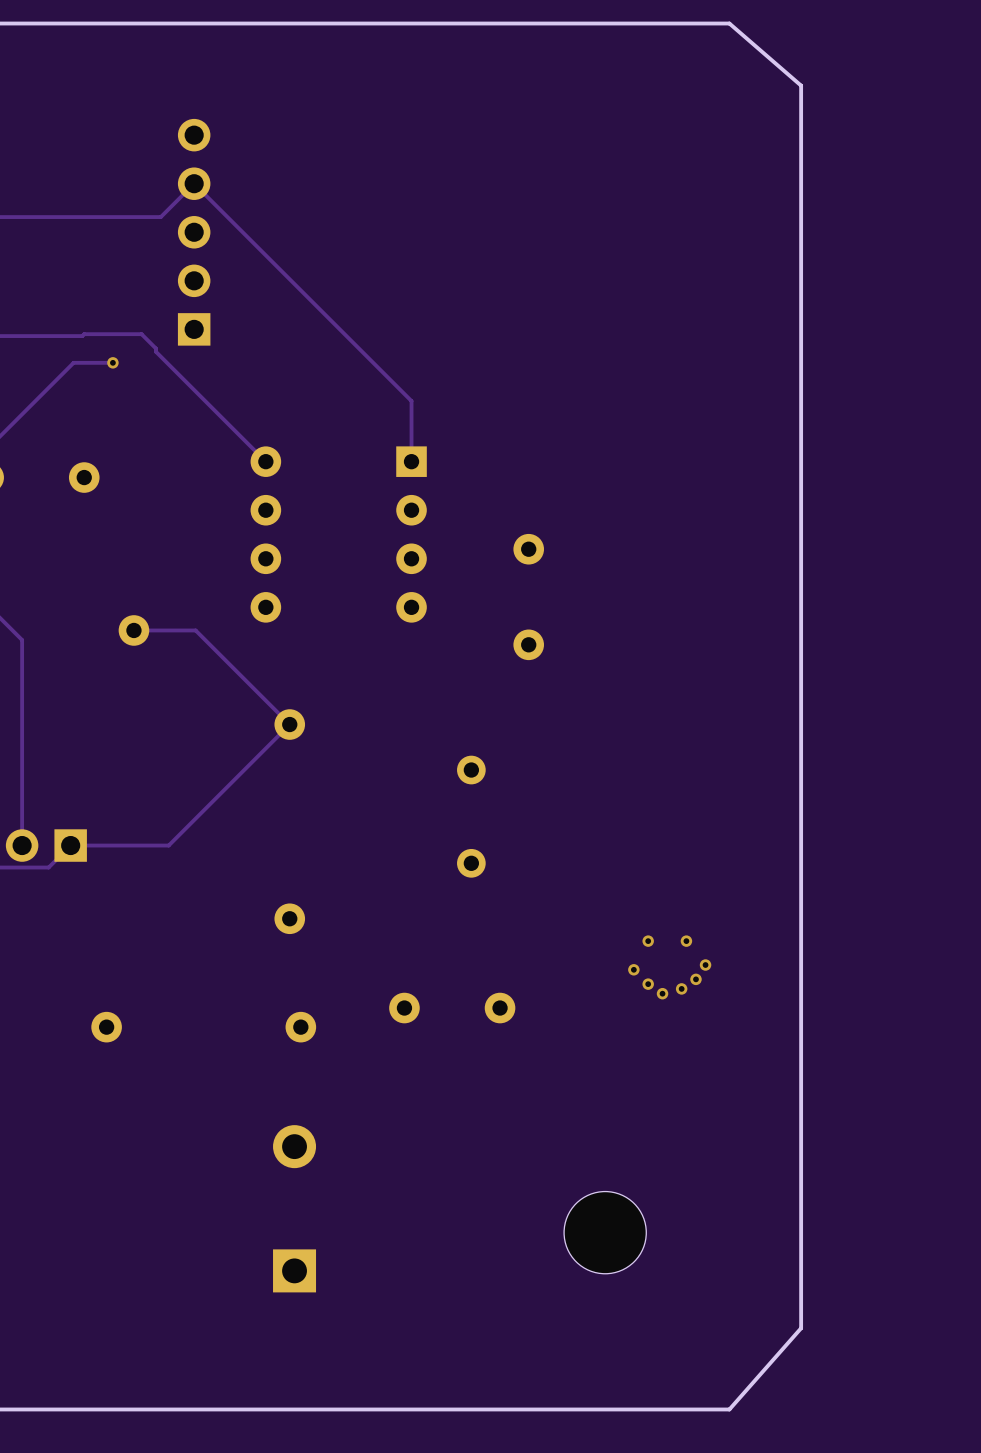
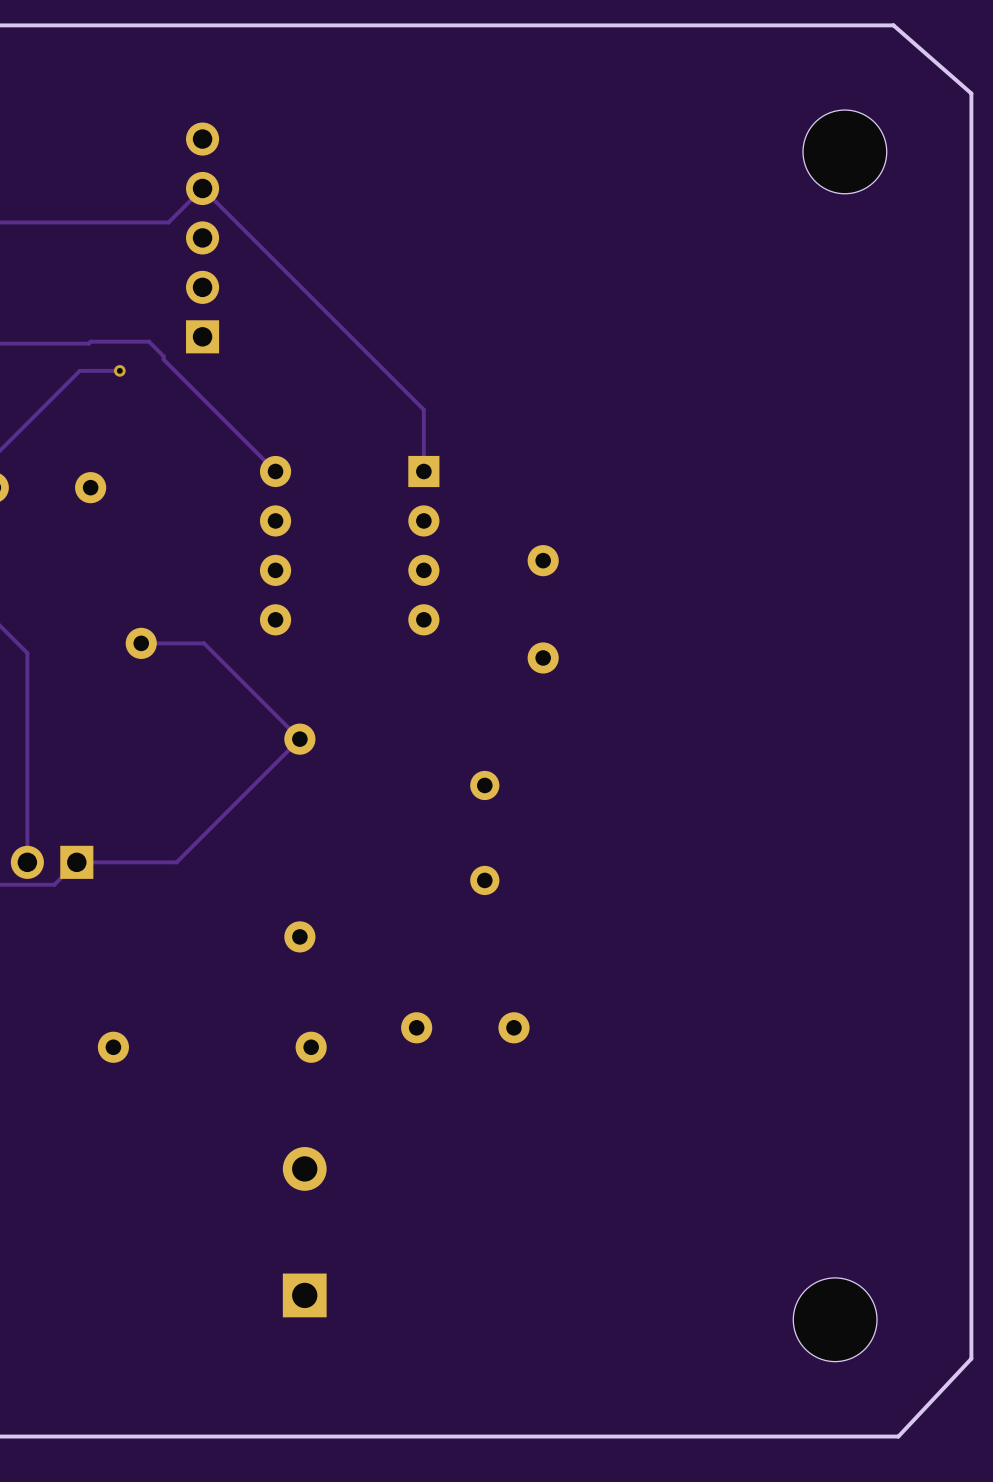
board edge: (729, 23) (801, 85) (801, 1328) (729, 1409) -> (747, 25) (893, 25) (971, 93) (971, 1358) (898, 1436) (747, 1436)
part: none -> (844, 151)
via: (648, 941) -> none
via: (686, 941) -> none
via: (705, 965) -> none
via: (633, 969) -> none
via: (695, 979) -> none
via: (648, 984) -> none
via: (681, 988) -> none
via: (662, 993) -> none
part position: (605, 1232) -> (835, 1319)

